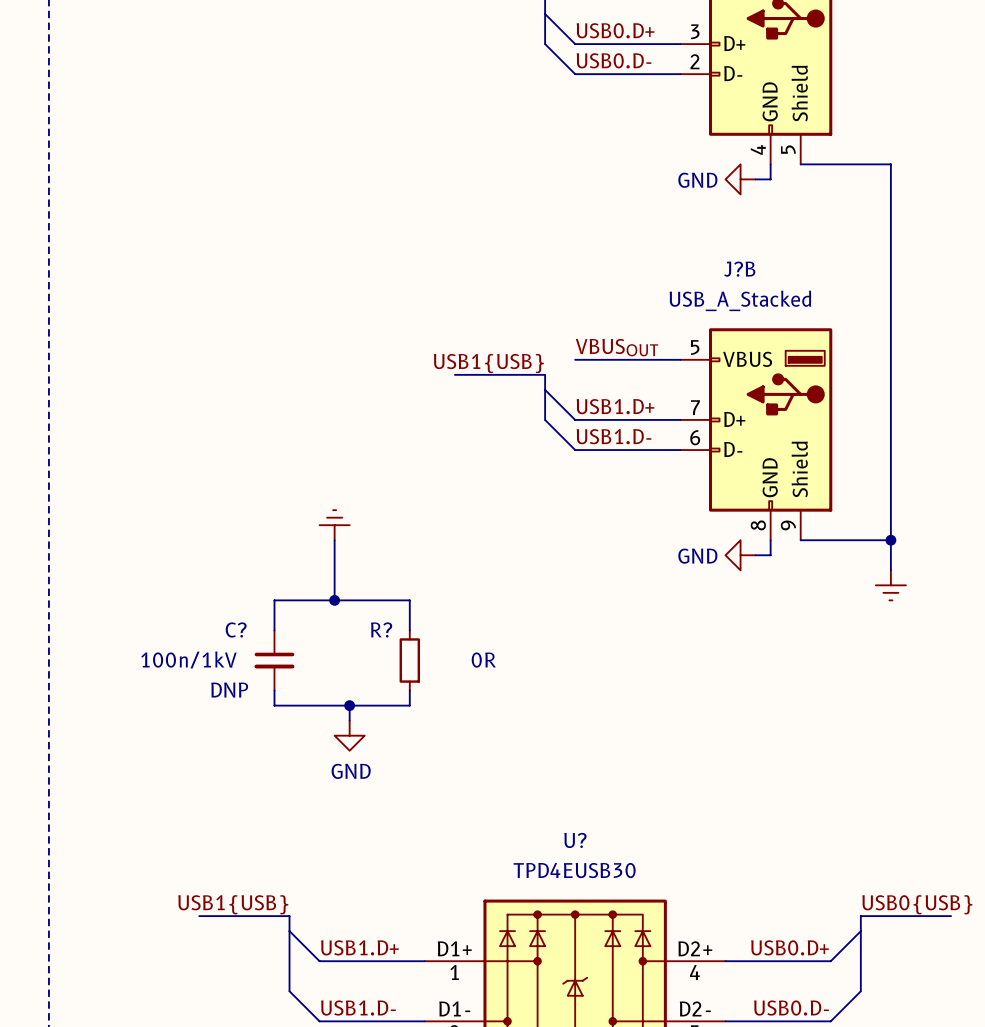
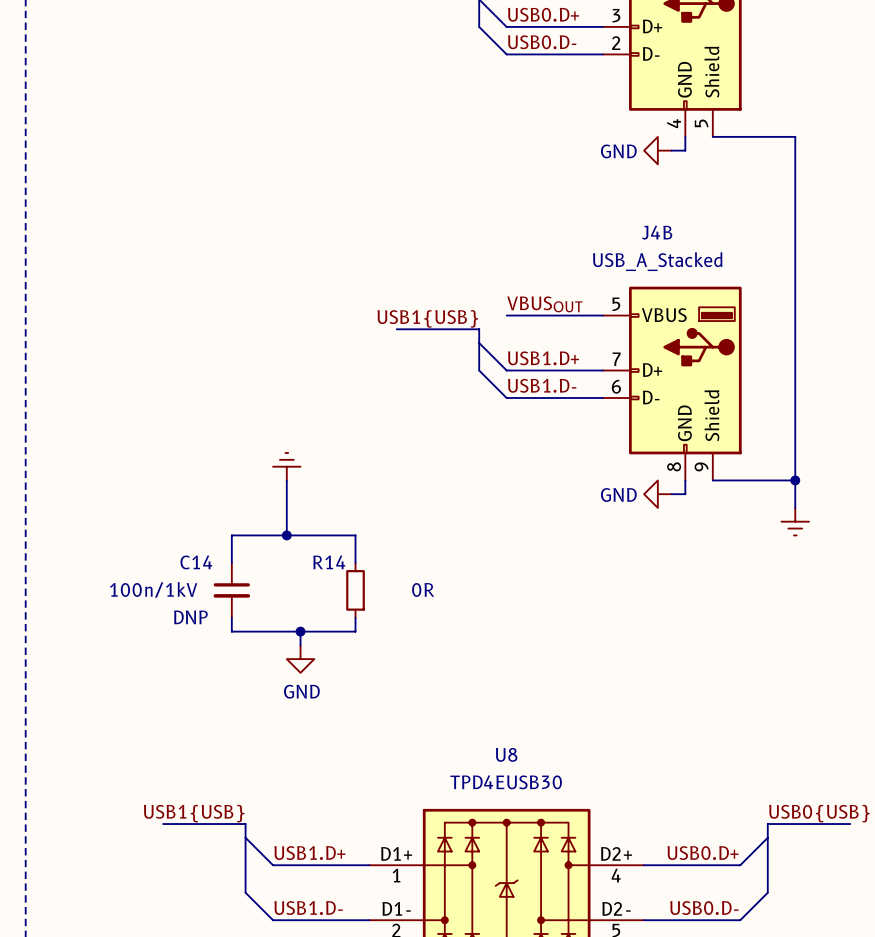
J?B name: J?B (739, 269) -> J4B (657, 232)
C? name: C? (236, 629) -> C14 (196, 562)
R? name: R? (381, 629) -> R14 (329, 562)
U? name: U? (575, 840) -> U8 (506, 754)

